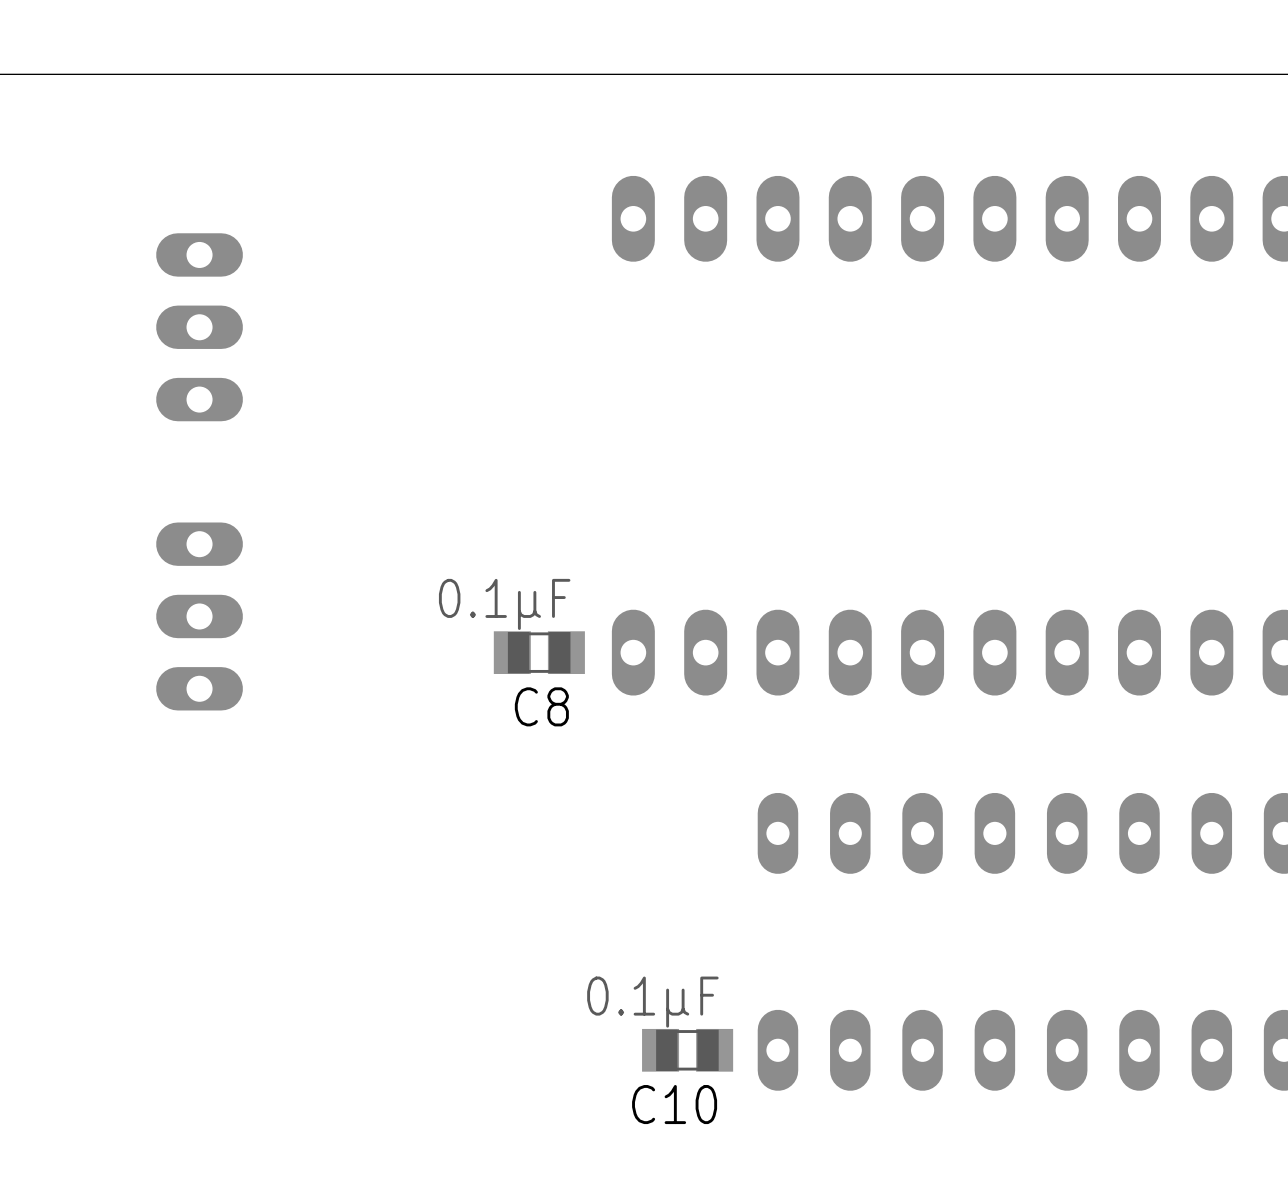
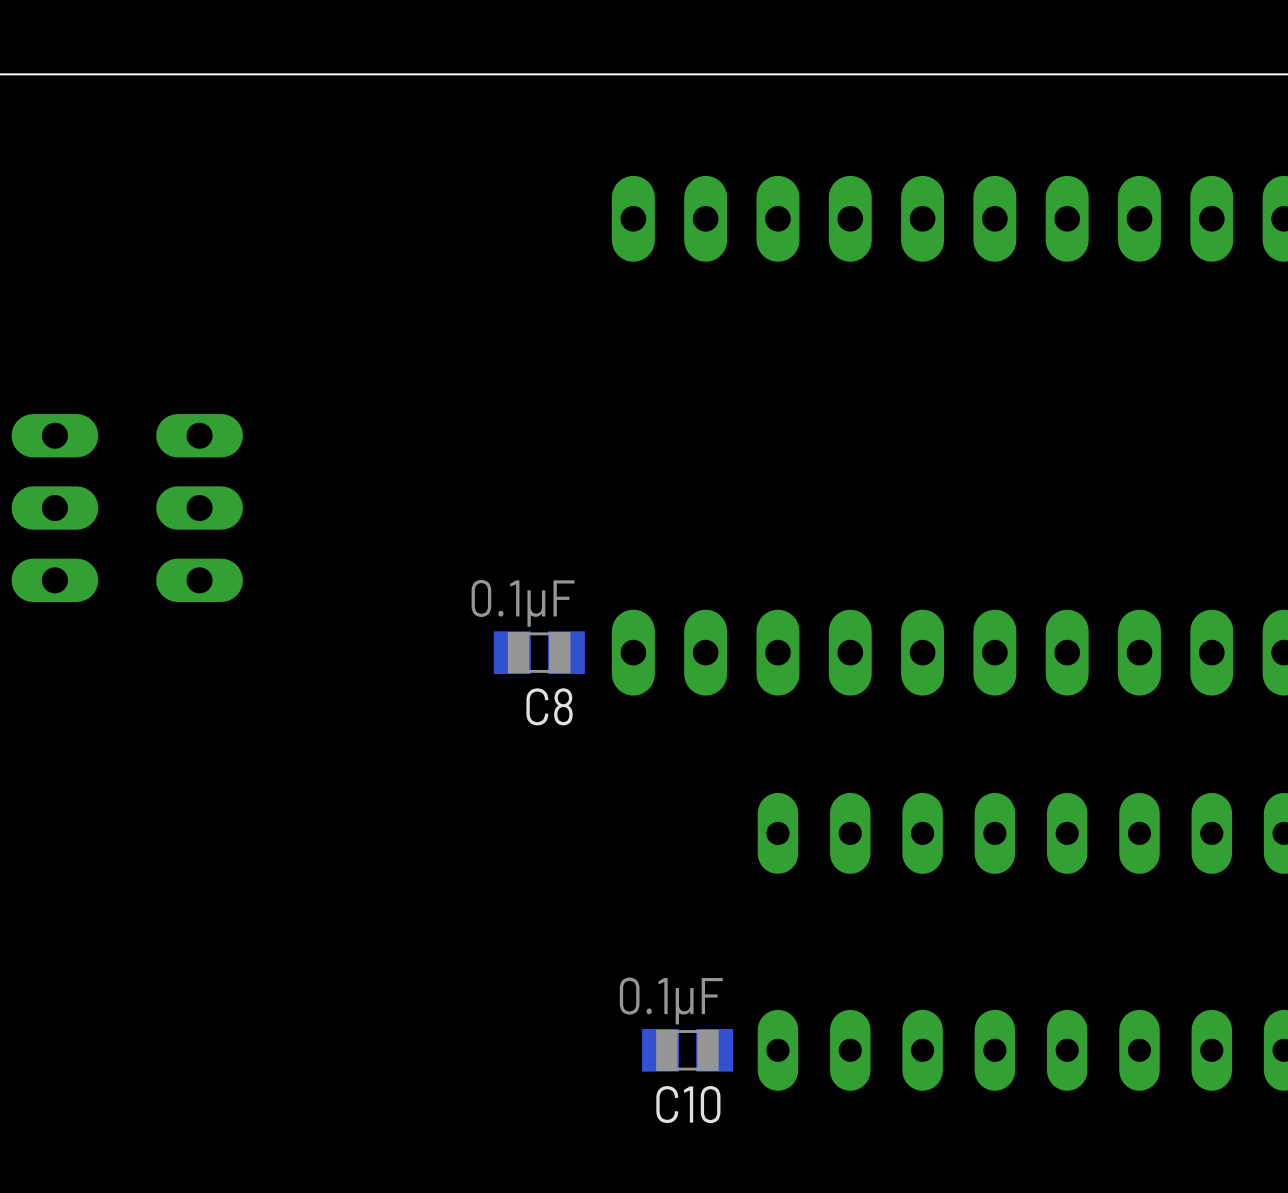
part: (199, 327) -> none
part: none -> (54, 508)
part: none -> (199, 508)
part: (199, 616) -> none

